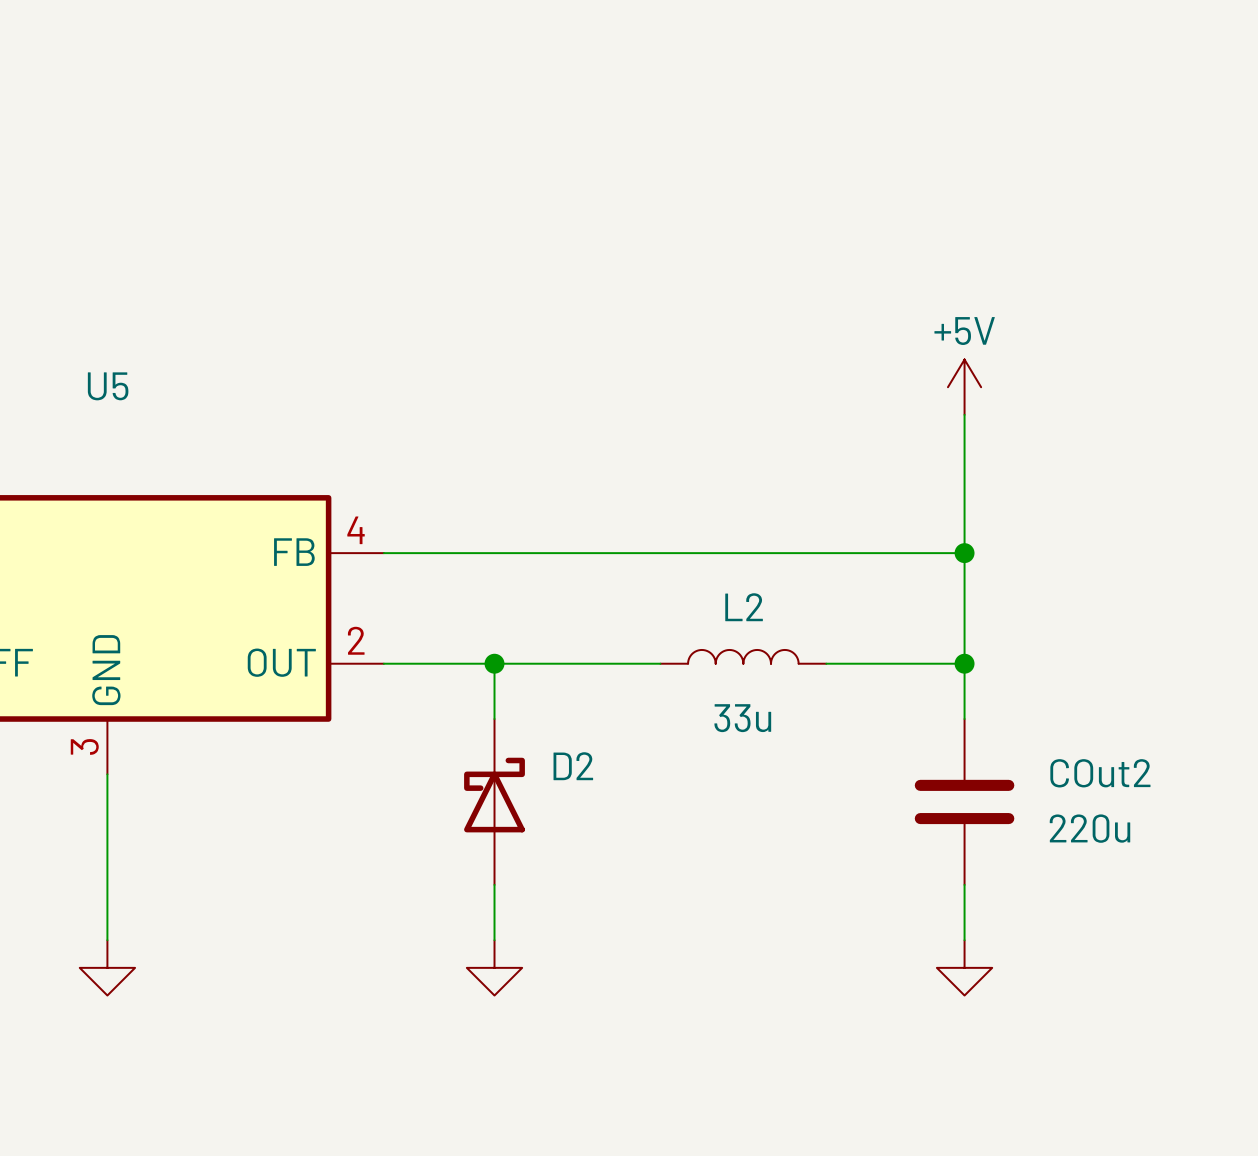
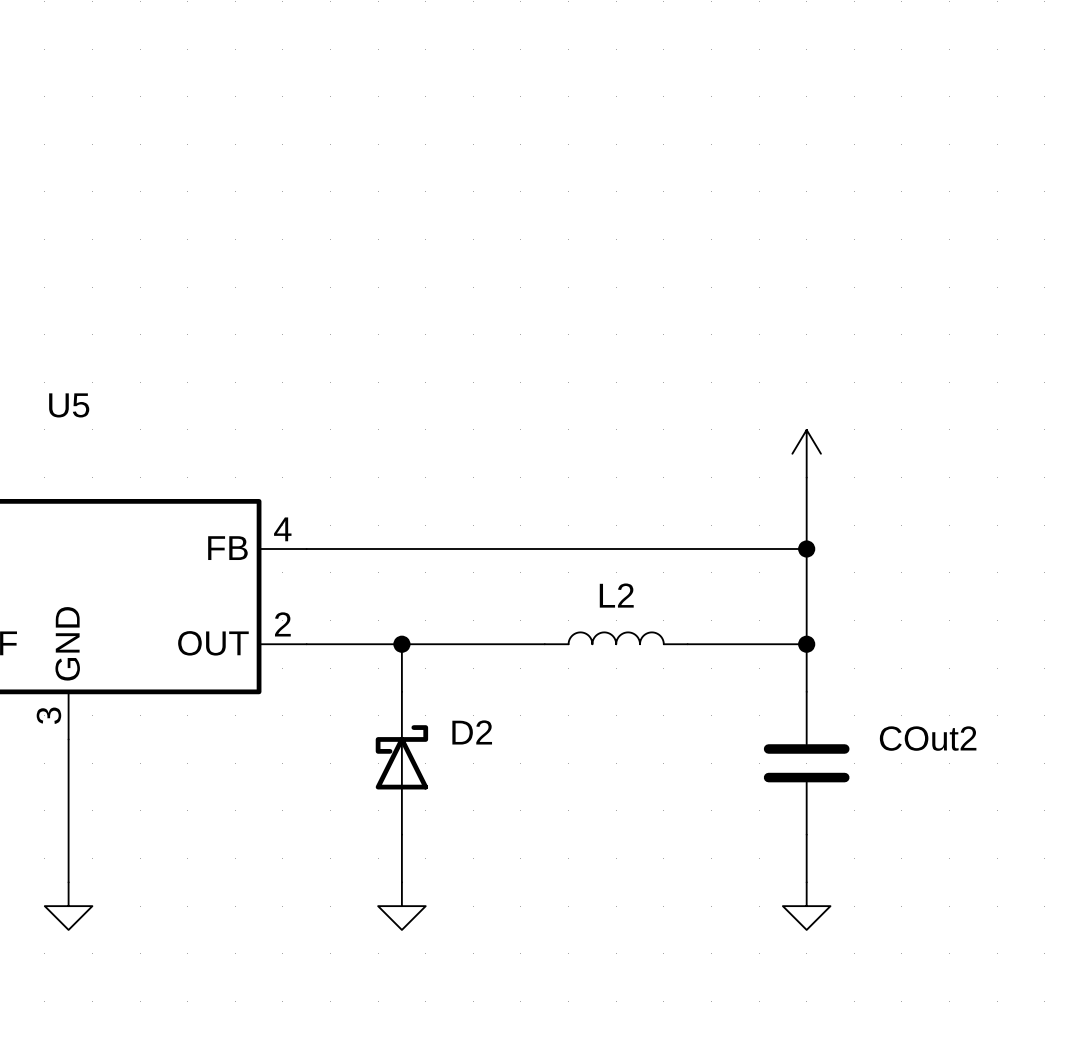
power symbol: +5V (964, 387) -> none
power symbol: none -> (806, 453)
L2 value: 33u (742, 718) -> none
COut2 value: 220u (1089, 828) -> none

